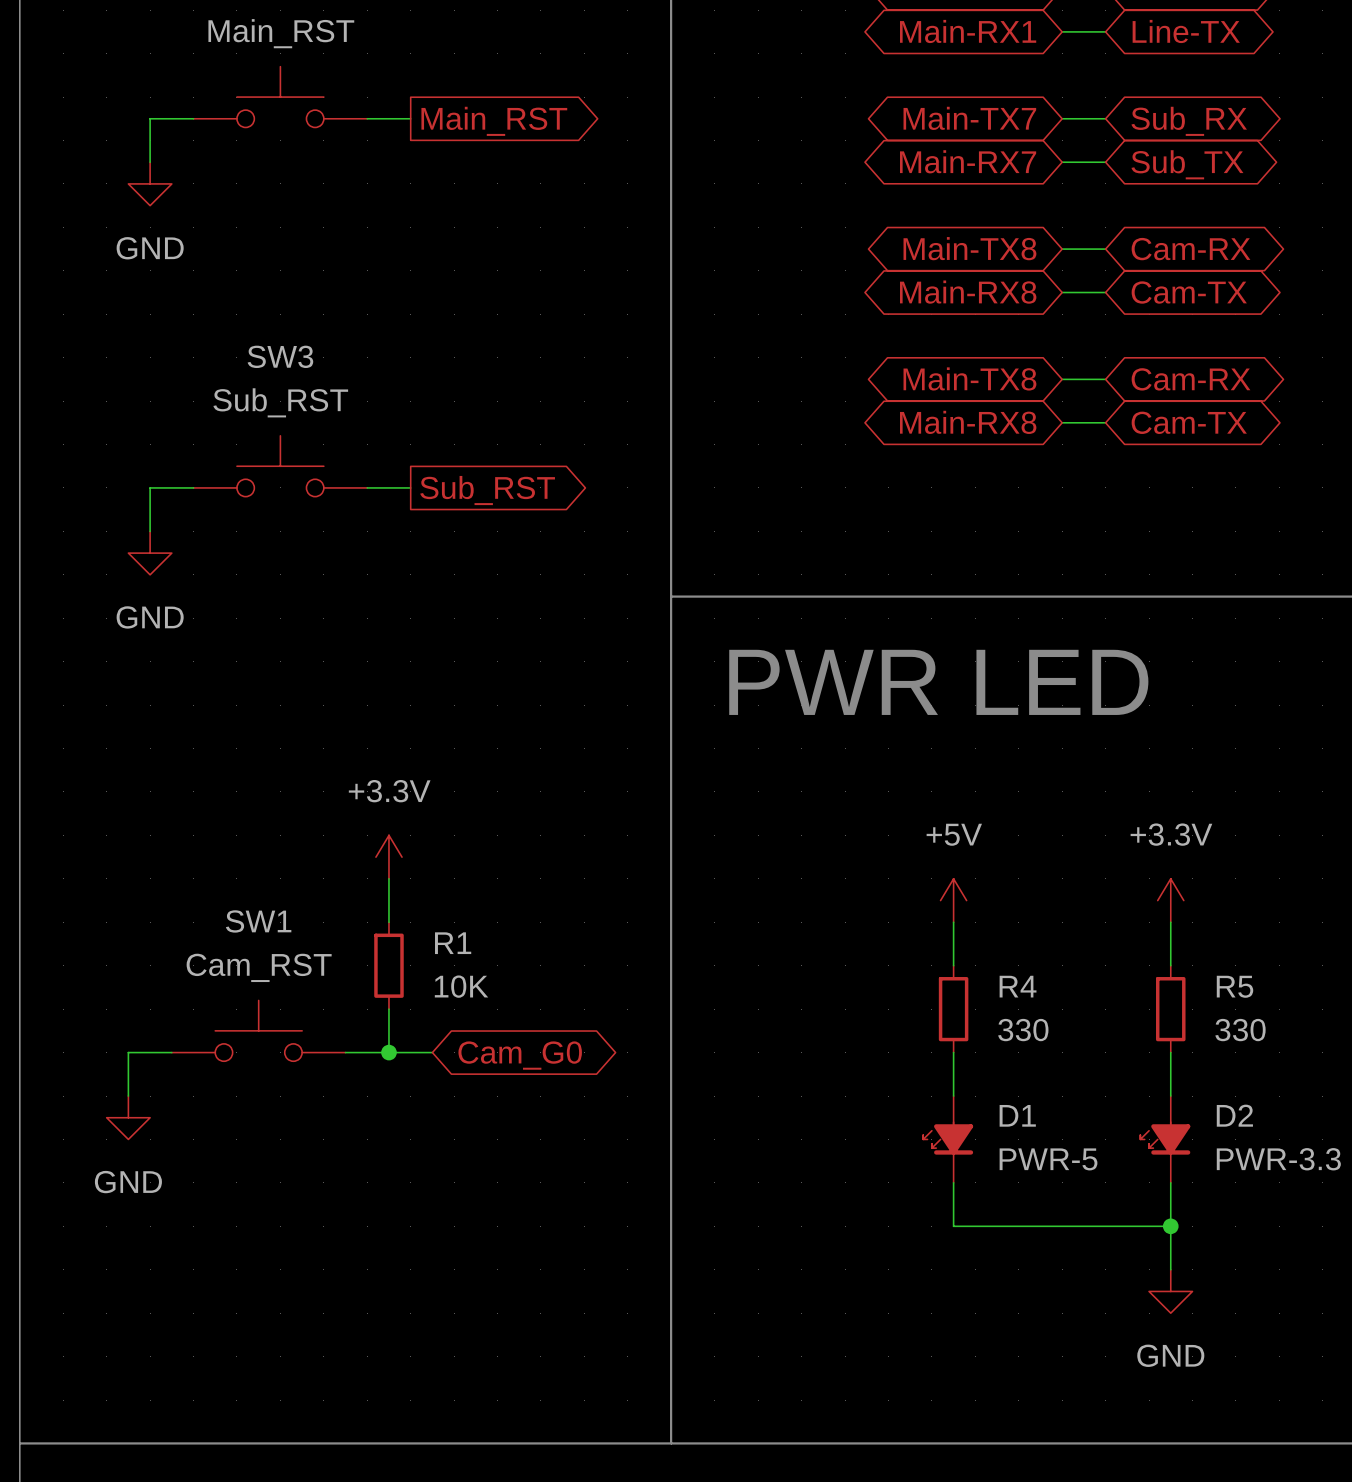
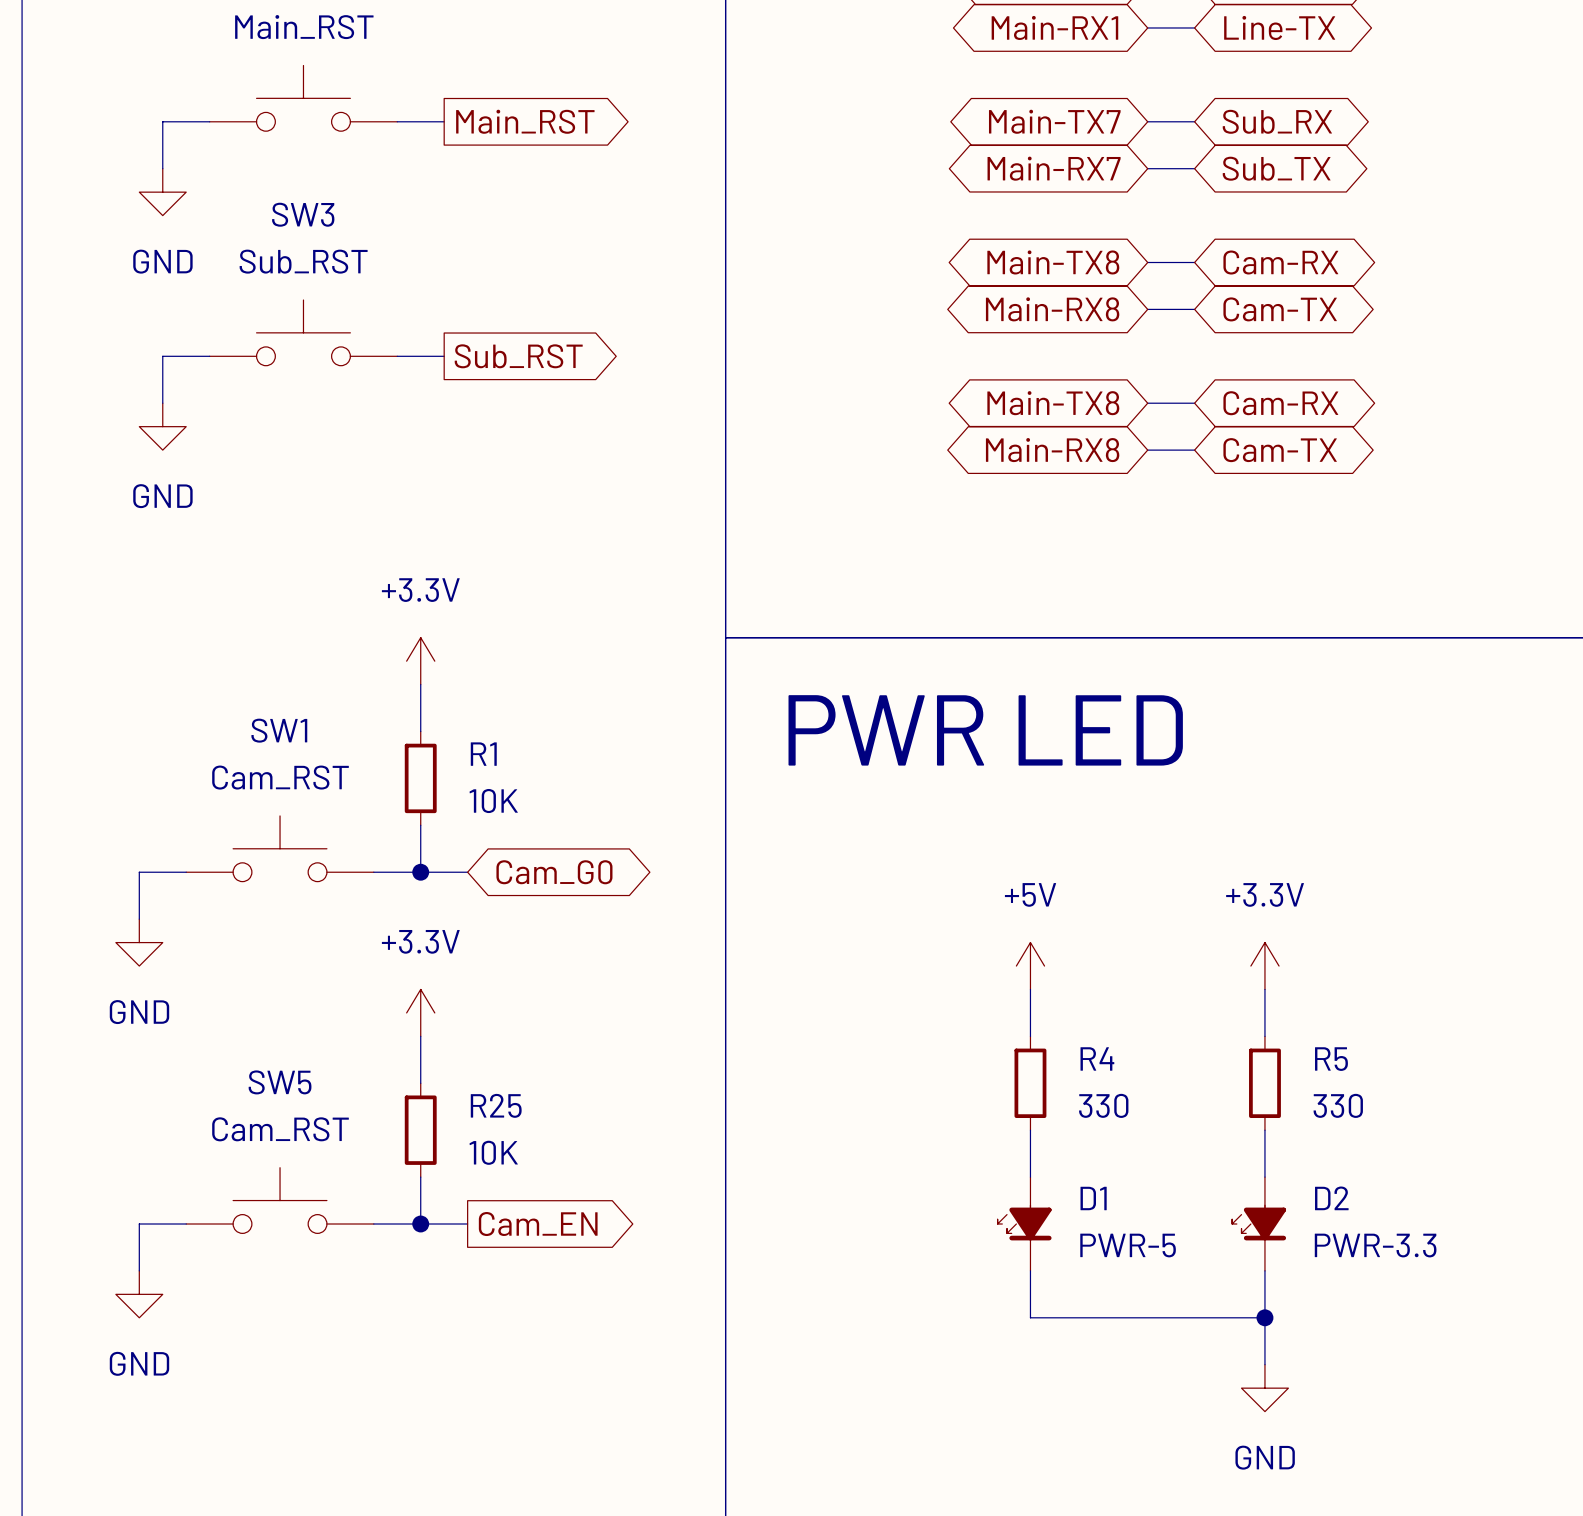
SW3 position: (280, 466) -> (303, 332)
wire: (193, 487) (150, 487) (150, 531) -> (209, 356) (162, 356) (162, 403)
wire: (367, 487) (410, 487) -> (397, 356) (444, 356)
global label position: Sub_RST (487, 490) -> Sub_RST (518, 356)
power symbol position: GND (150, 553) -> GND (162, 426)
power symbol: none -> +3.3V (420, 661)
wire: none -> (420, 825) (420, 872)
wire: none -> (186, 872) (139, 872) (139, 919)
wire: none -> (373, 872) (467, 872)
junction: none -> (420, 872)
power symbol position: +3.3V (388, 857) -> +3.3V (420, 1012)
power symbol: none -> GND (139, 942)
wire: (388, 878) (388, 922) -> (420, 684) (420, 731)
R1 position: (388, 965) -> (420, 778)
wire: (388, 1009) (388, 1052) -> (420, 1083) (420, 1036)
SW1 position: (258, 1030) -> (280, 848)
wire: (171, 1052) (128, 1052) (128, 1096) -> (186, 1224) (139, 1224) (139, 1270)
wire: (345, 1052) (432, 1052) -> (373, 1224) (467, 1224)
junction position: (388, 1052) -> (420, 1224)
R25: none -> 10K (420, 1130)
global label position: Cam_G0 (520, 1055) -> Cam_G0 (554, 872)
wire: none -> (420, 1177) (420, 1224)
power symbol position: GND (128, 1117) -> GND (139, 1294)
SW5: none -> Cam_RST (280, 1200)
global label: none -> Cam_EN (538, 1224)

